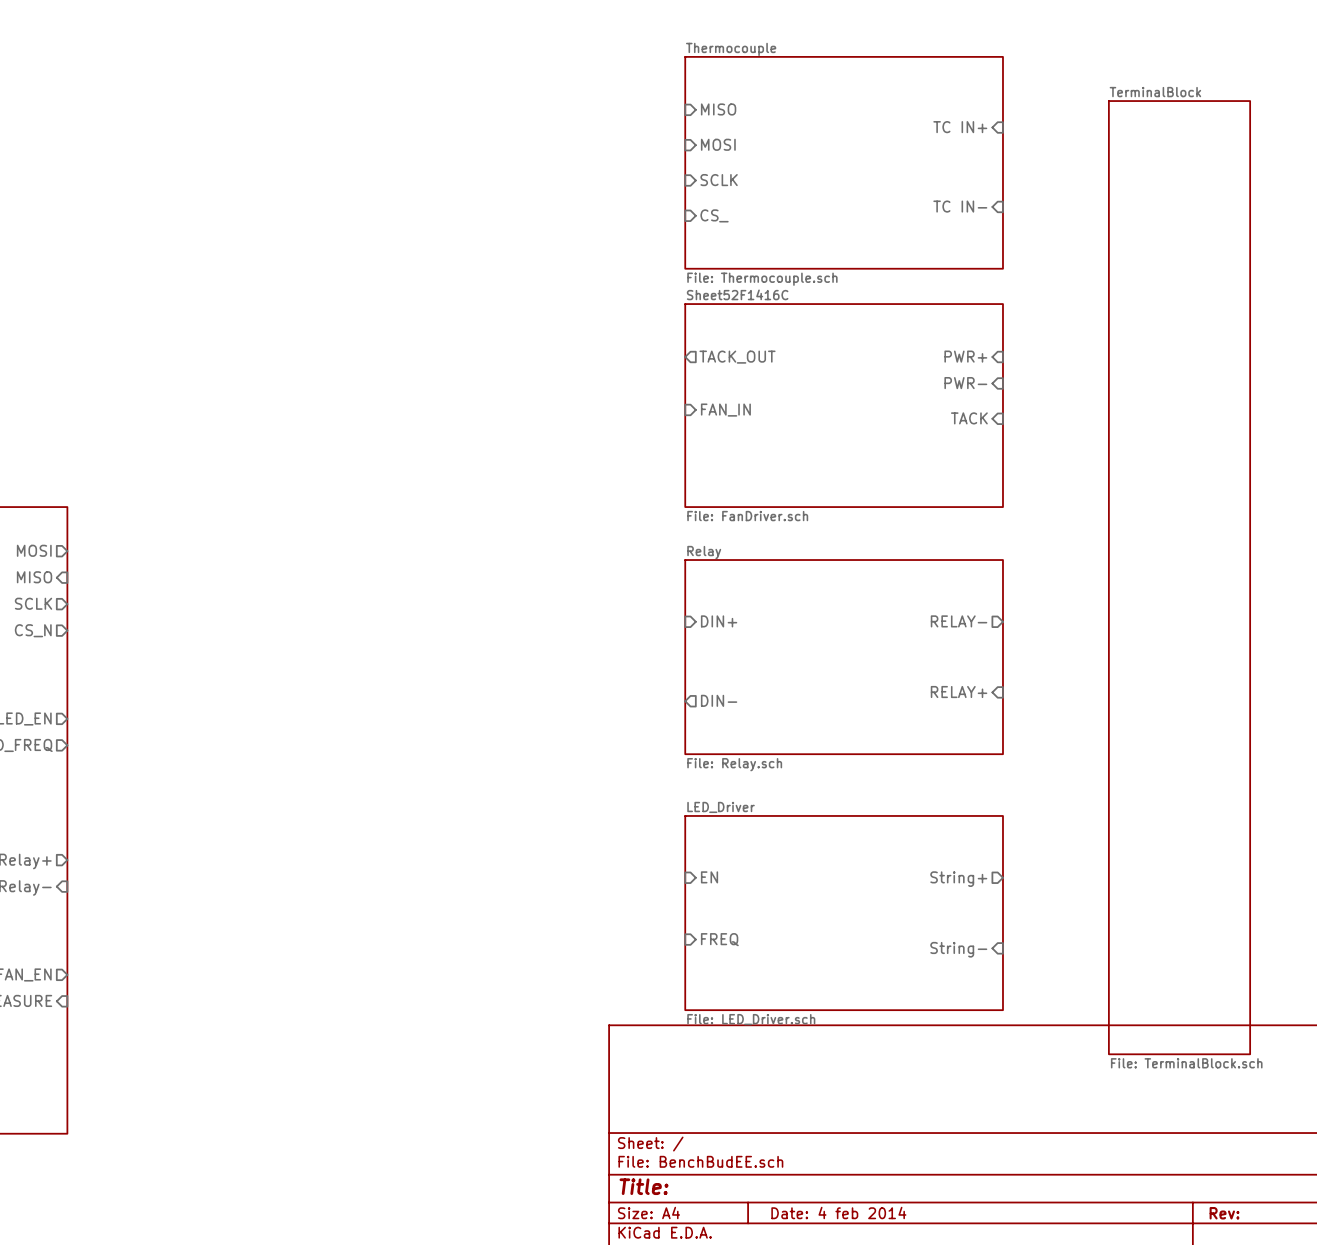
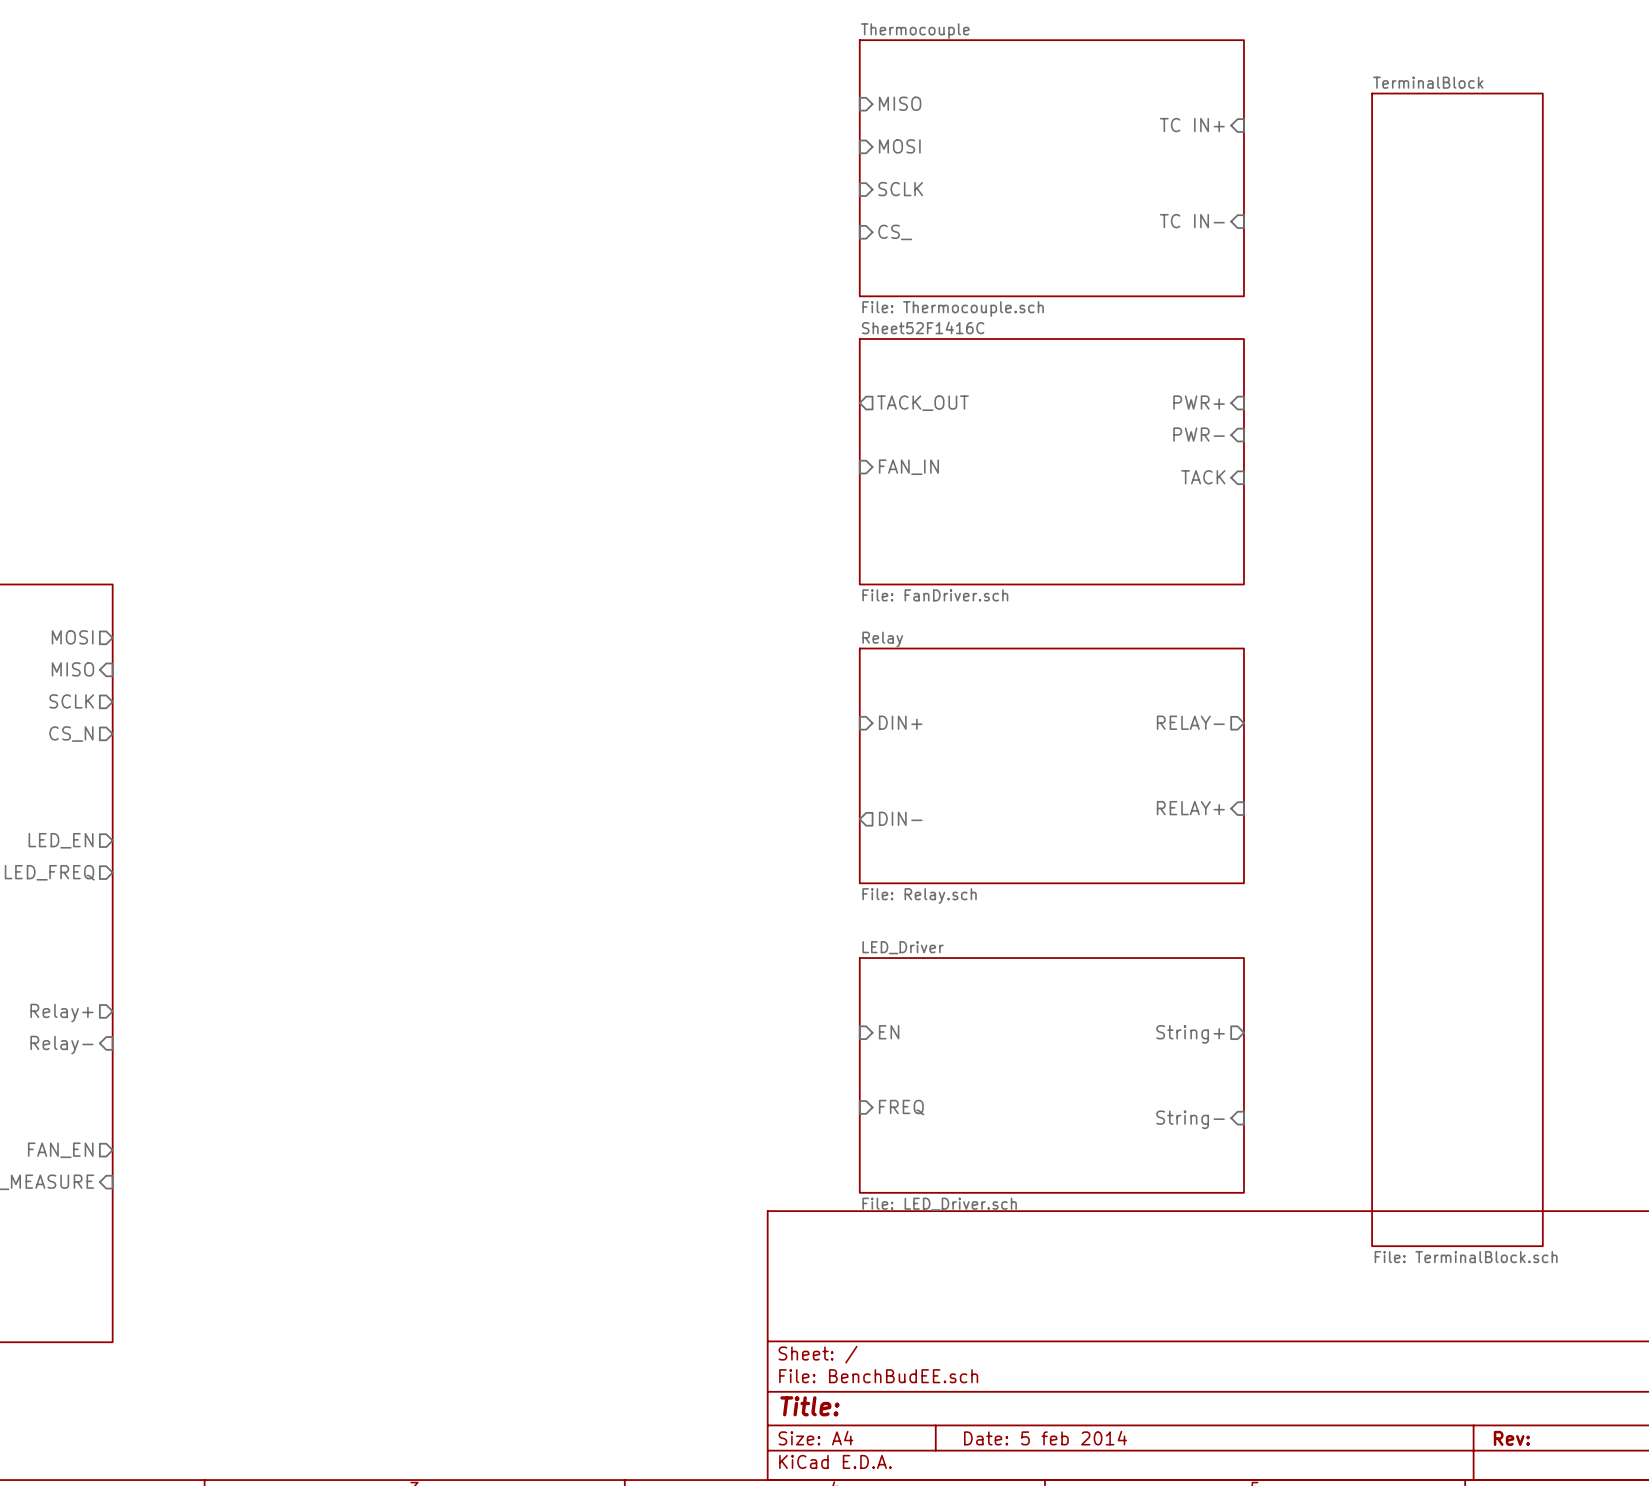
title block: Date: 4 feb 2014 (838, 1213) -> Date: 5 feb 2014 (1045, 1438)

